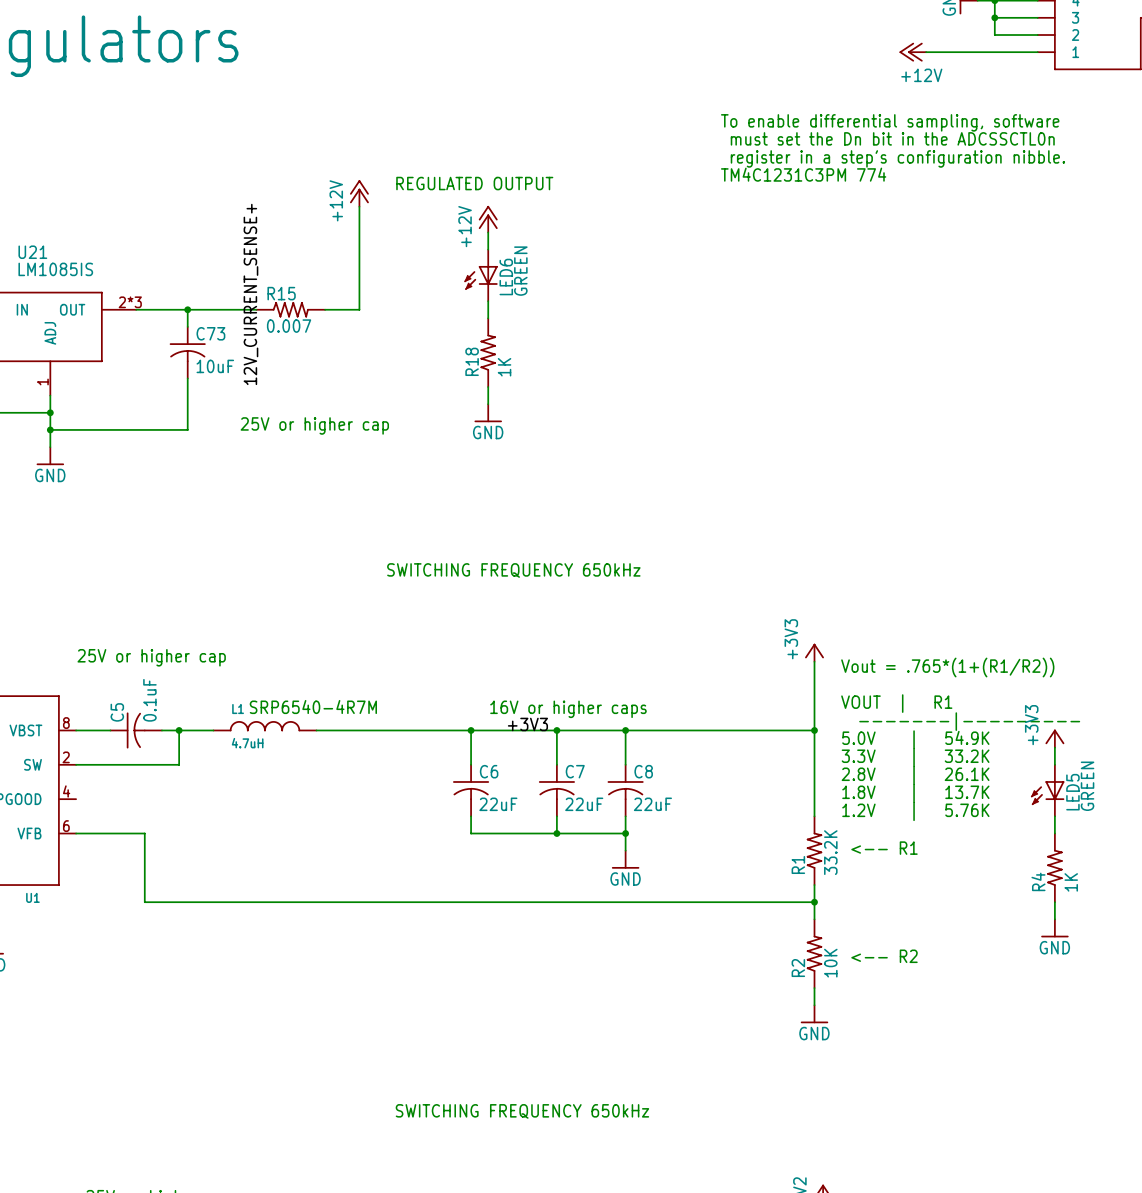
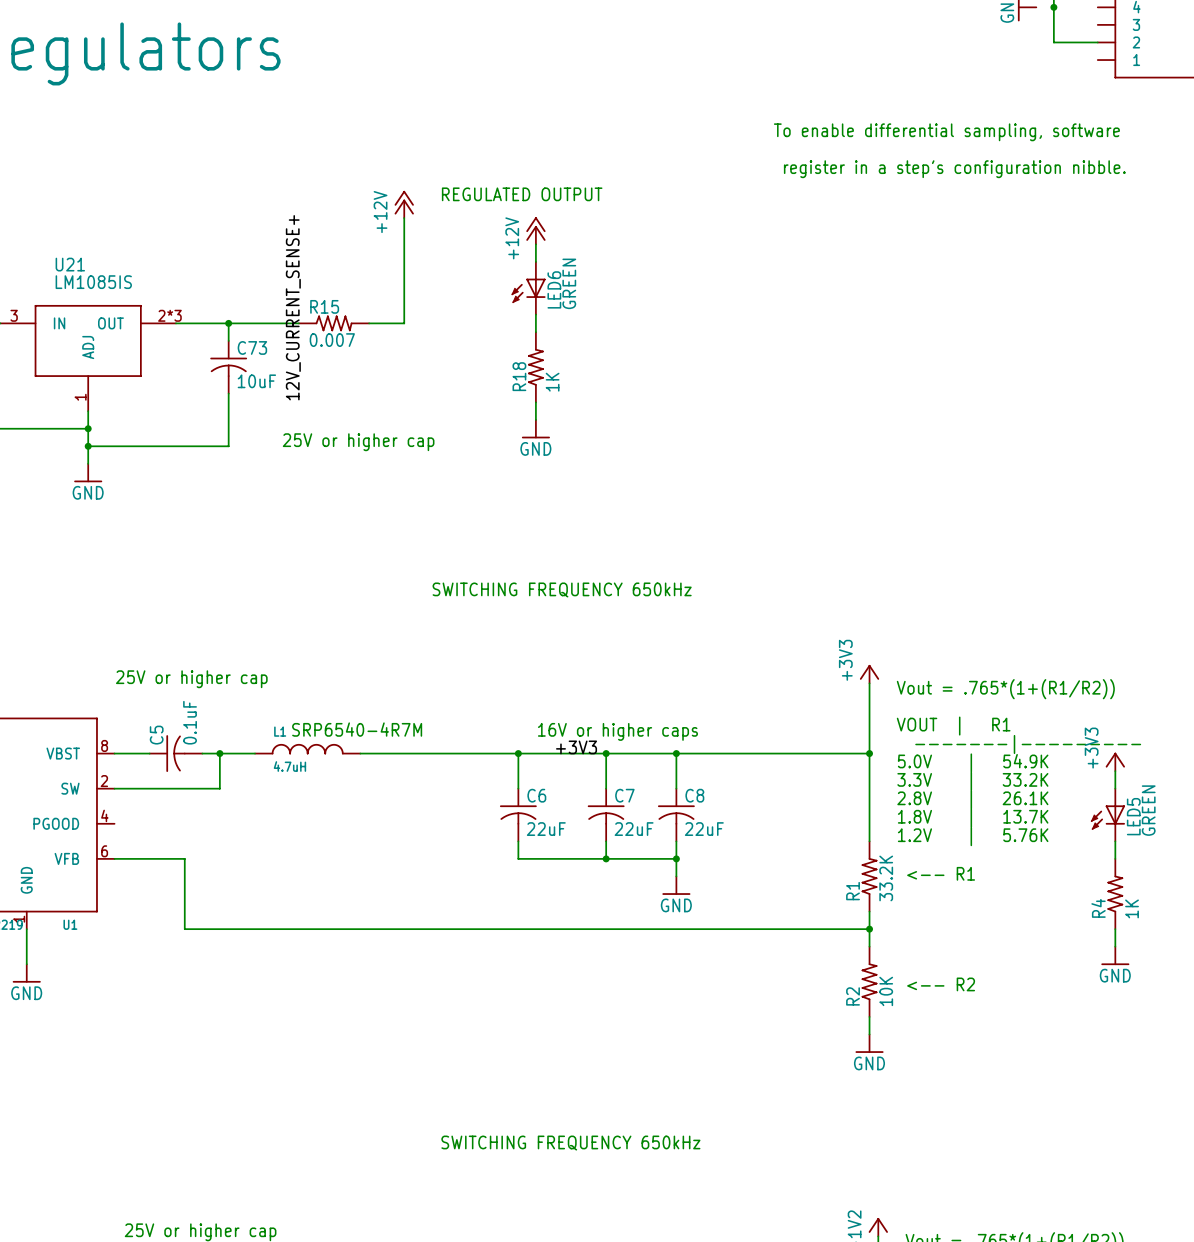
wire: (977, 0) (1037, 0) -> none
wire: (994, 17) (1037, 17) -> none
junction: (994, 17) -> none
power symbol: +12V (912, 52) -> none
wire: (926, 52) (1037, 52) -> none
text: must set the Dn bit in the ADCSSCTL0n (892, 138) -> none
text: TM4C1231C3PM 774 (803, 174) -> none

